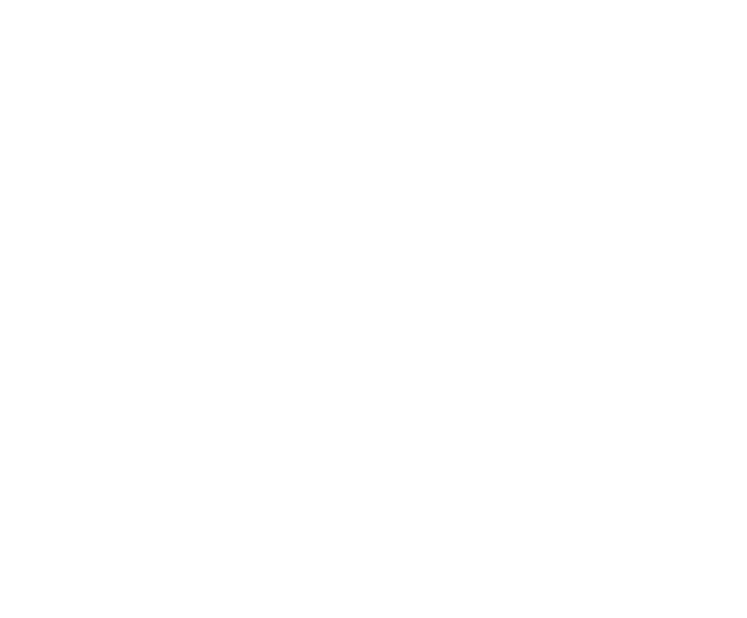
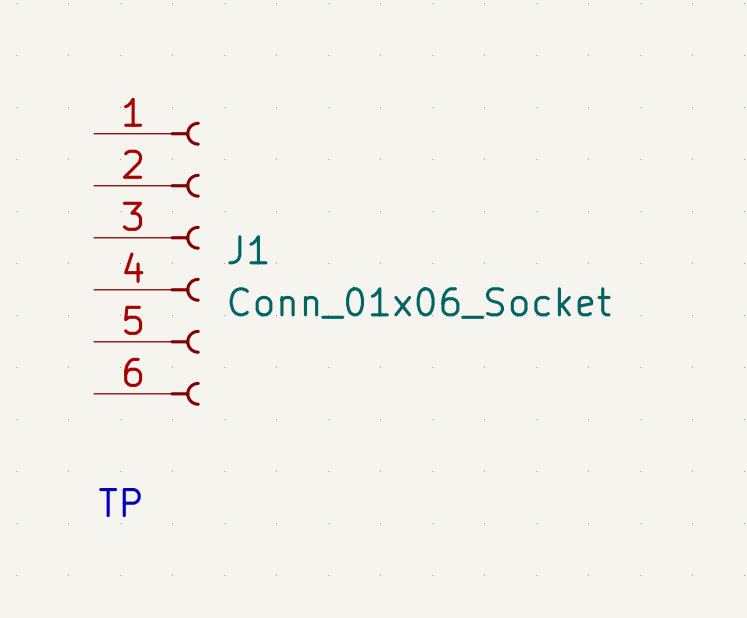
J1: none -> Conn_01x06_Socket (146, 263)
text: none -> TP (119, 502)

